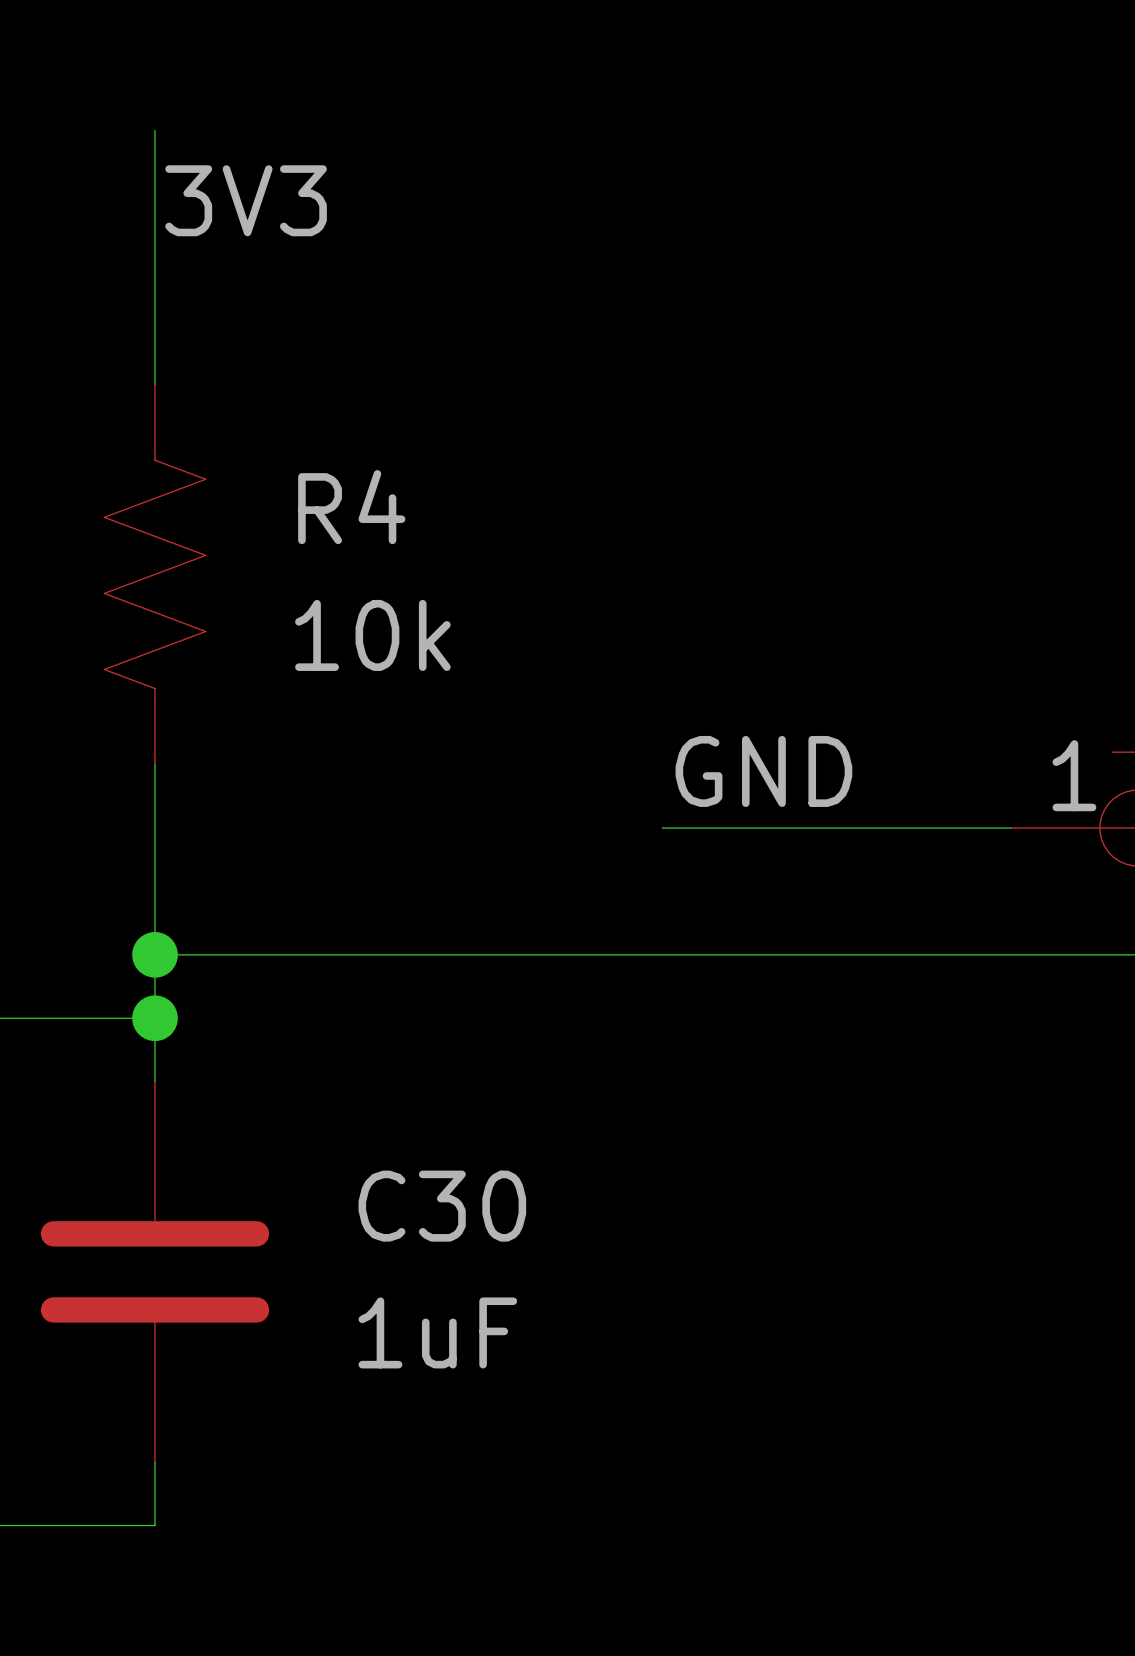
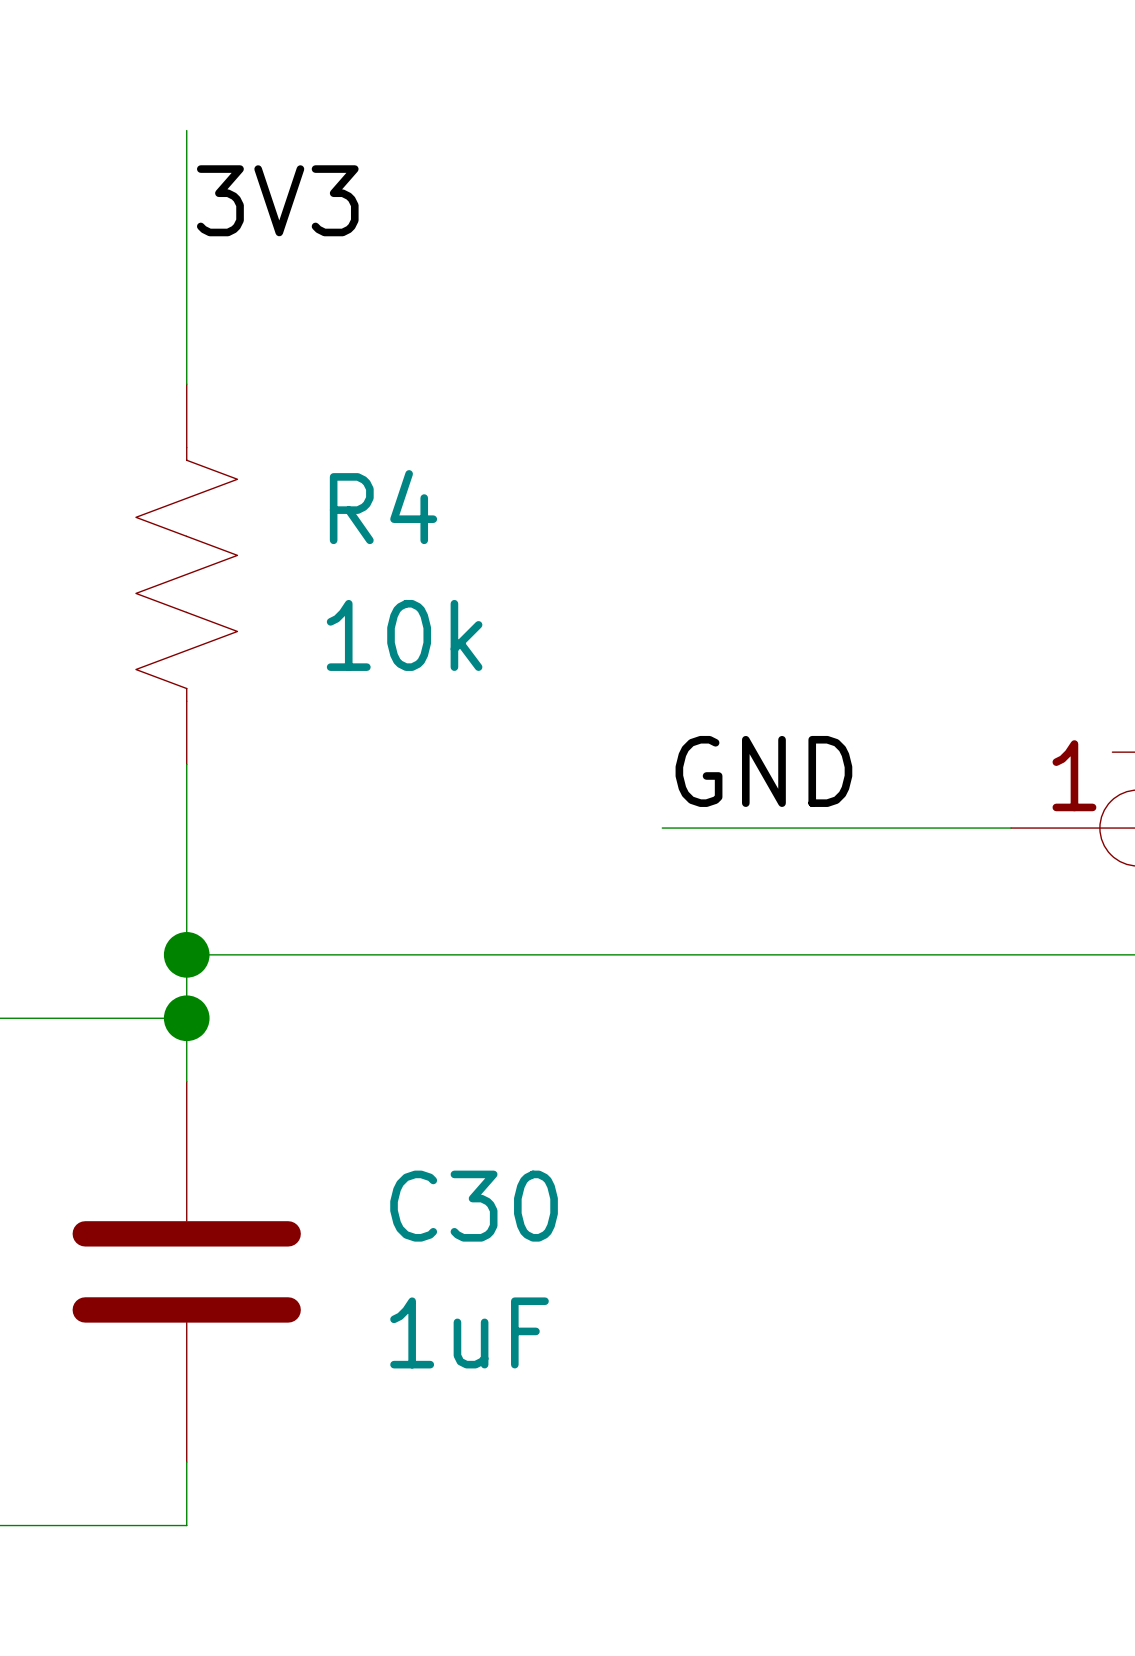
wire: (155, 130) (155, 384) -> (186, 130) (186, 384)
label position: 3V3 (246, 200) -> 3V3 (277, 200)
R4 position: (155, 574) -> (186, 574)
wire: (155, 764) (155, 1081) -> (186, 764) (186, 1081)
junction position: (155, 954) -> (186, 954)
junction position: (155, 1018) -> (186, 1018)
C30 position: (155, 1271) -> (186, 1271)
wire: (155, 1462) (155, 1525) -> (186, 1462) (186, 1525) (155, 1525)

